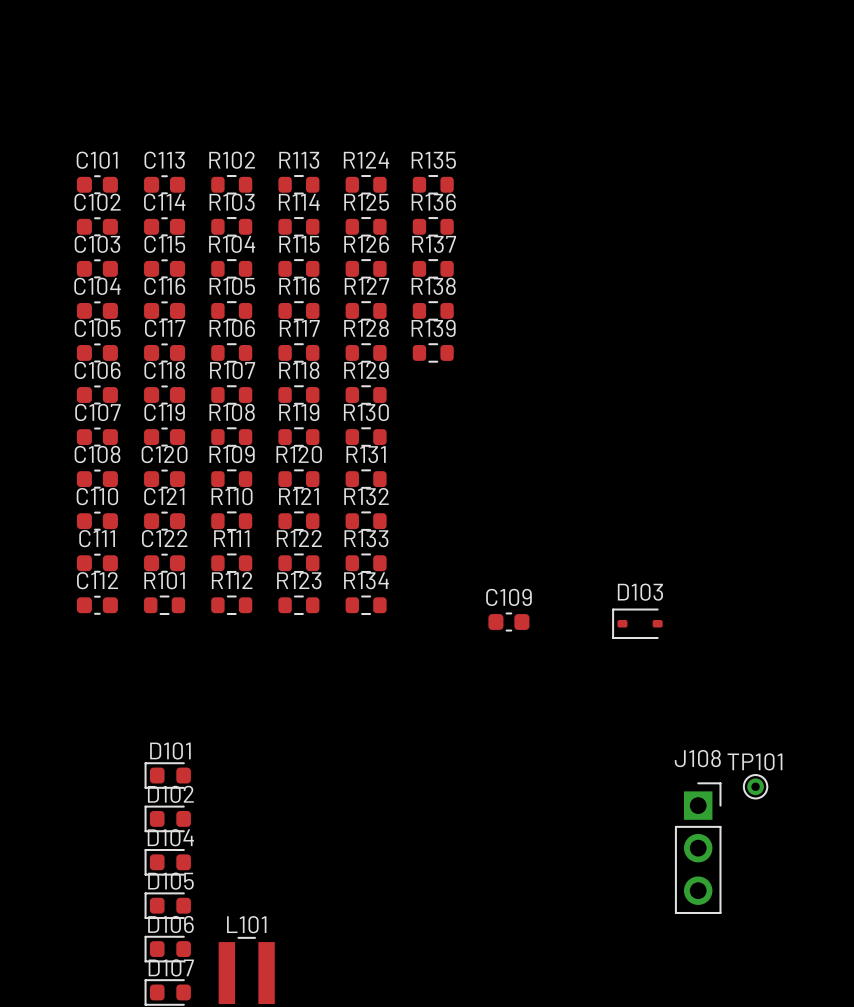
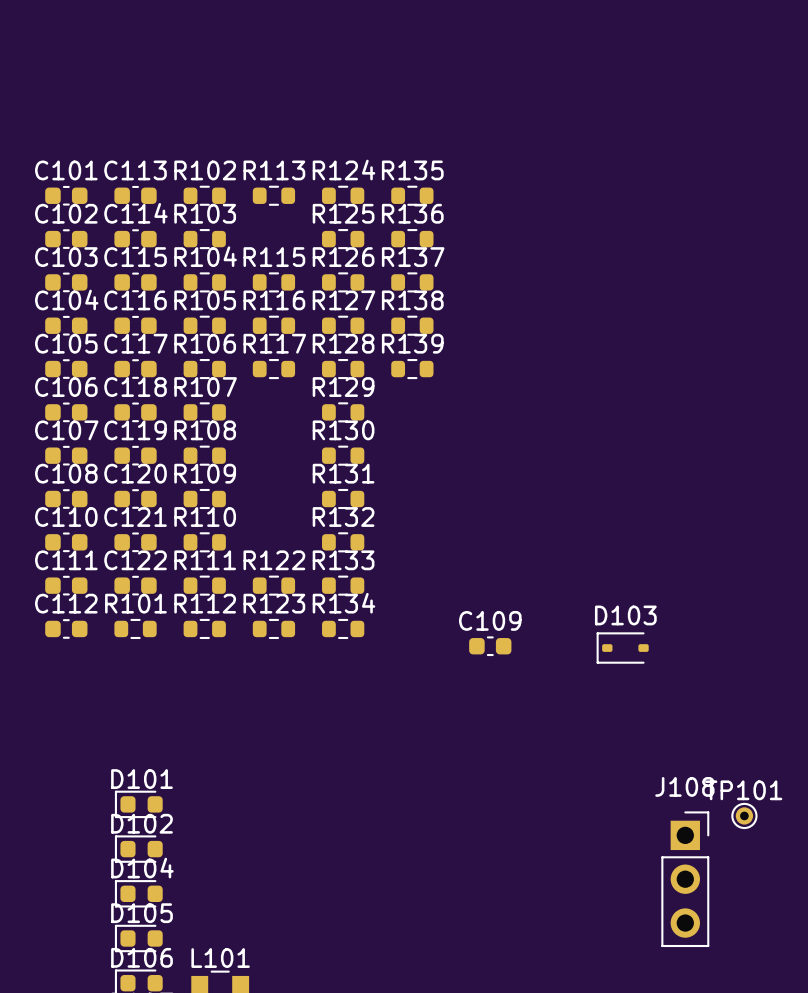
R114: (298, 226) -> none
R118: (298, 395) -> none
R119: (298, 437) -> none
R120: (298, 479) -> none
R121: (298, 521) -> none

